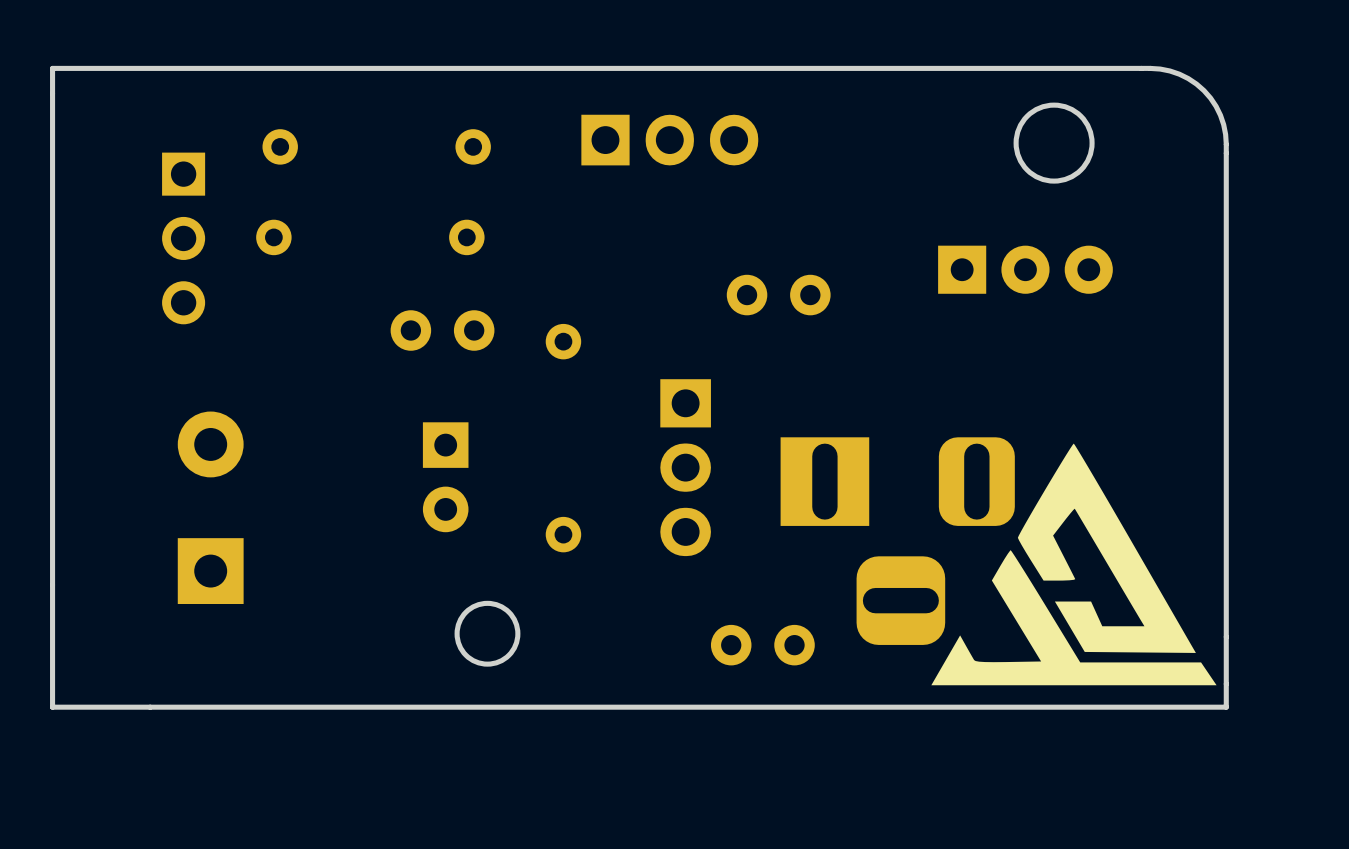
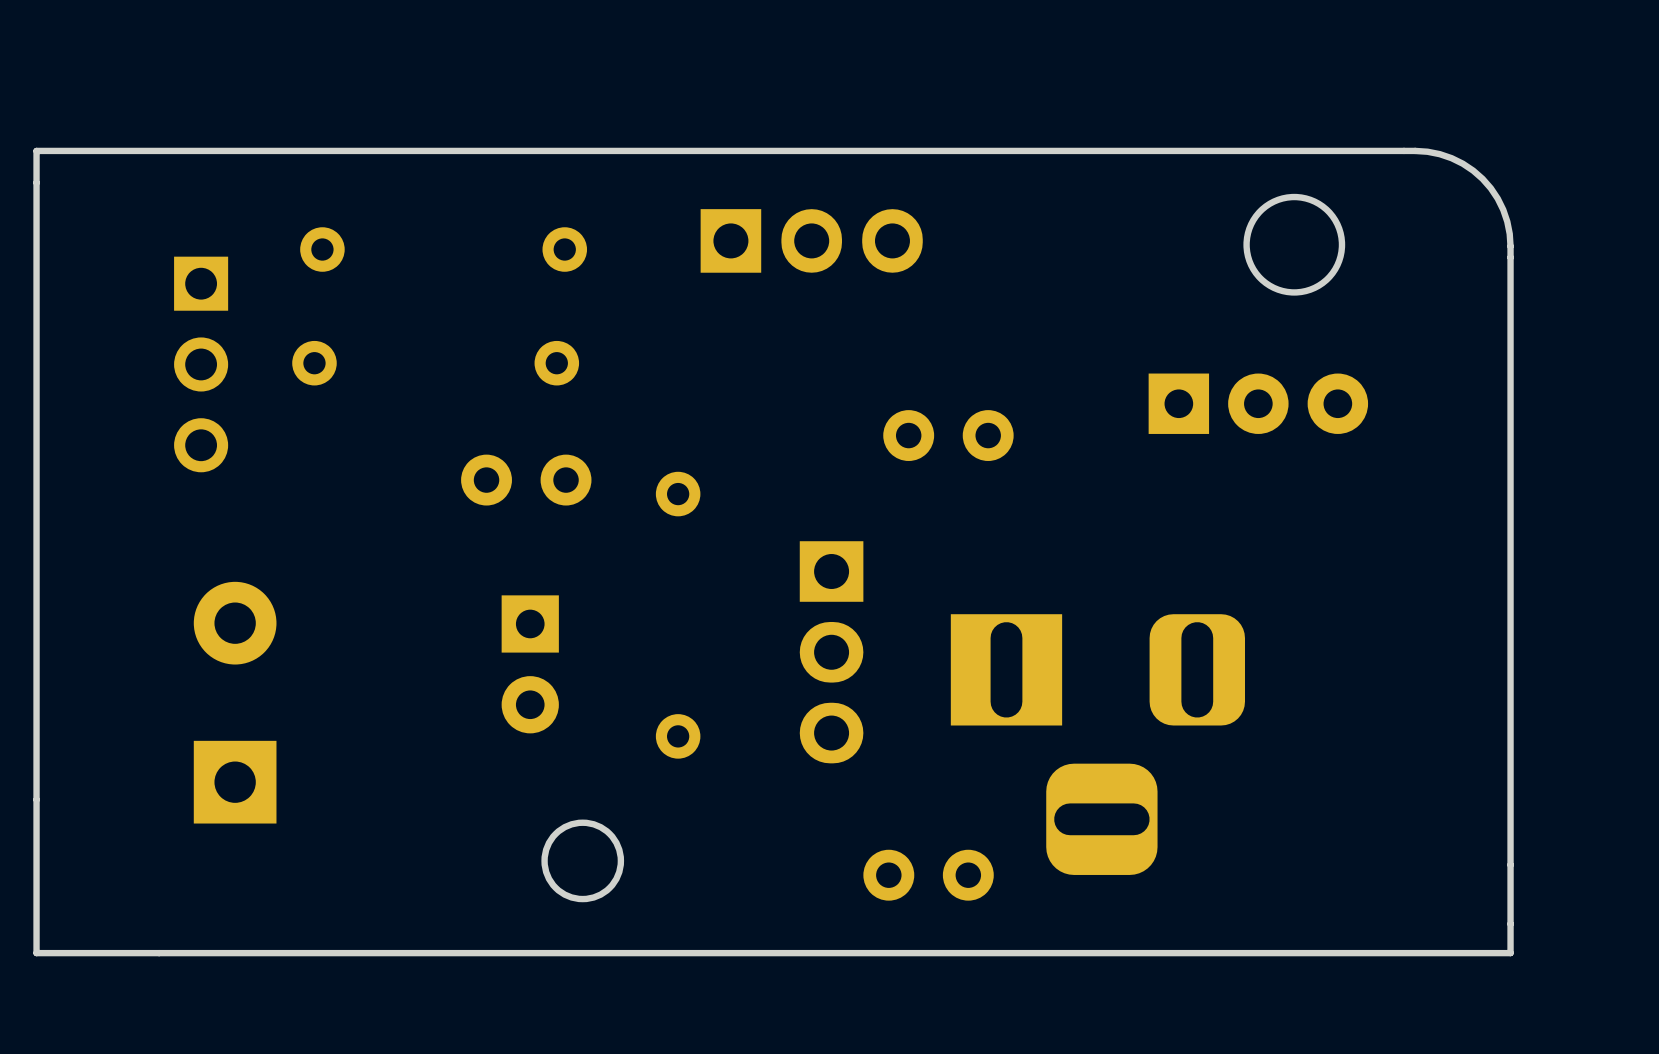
drawing: [931, 443, 1217, 686] -> none

